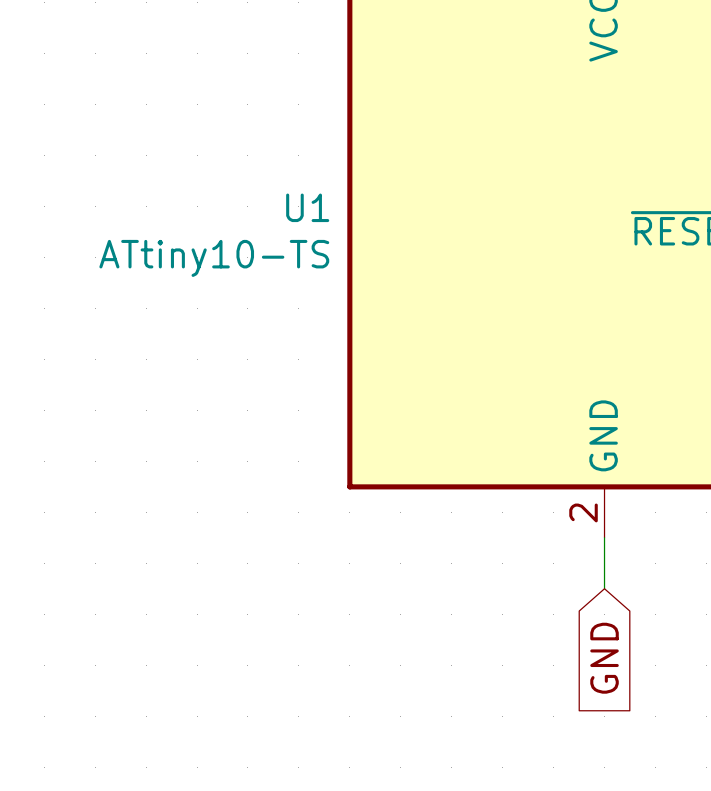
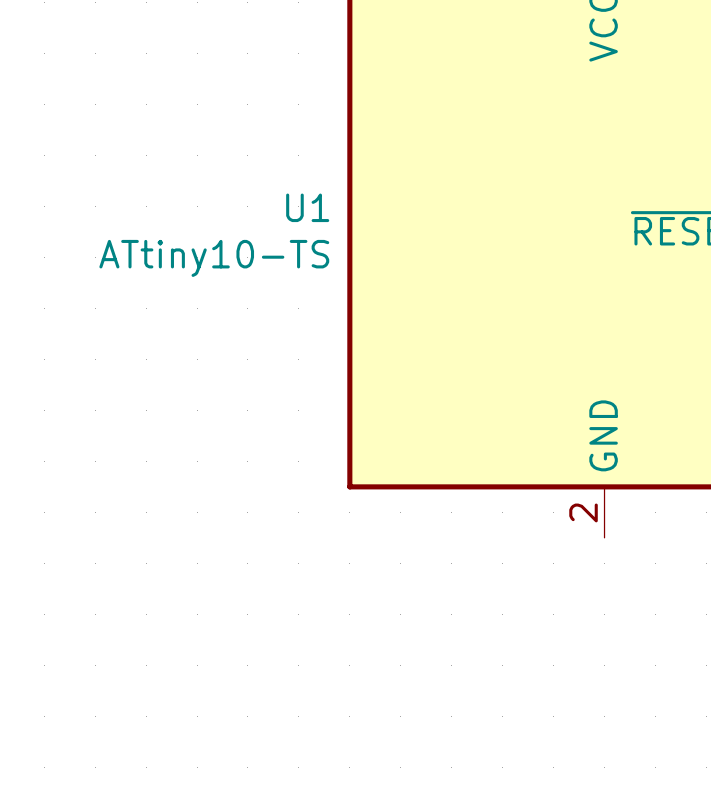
wire: (604, 537) (604, 588) -> none
global label: GND (604, 658) -> none

